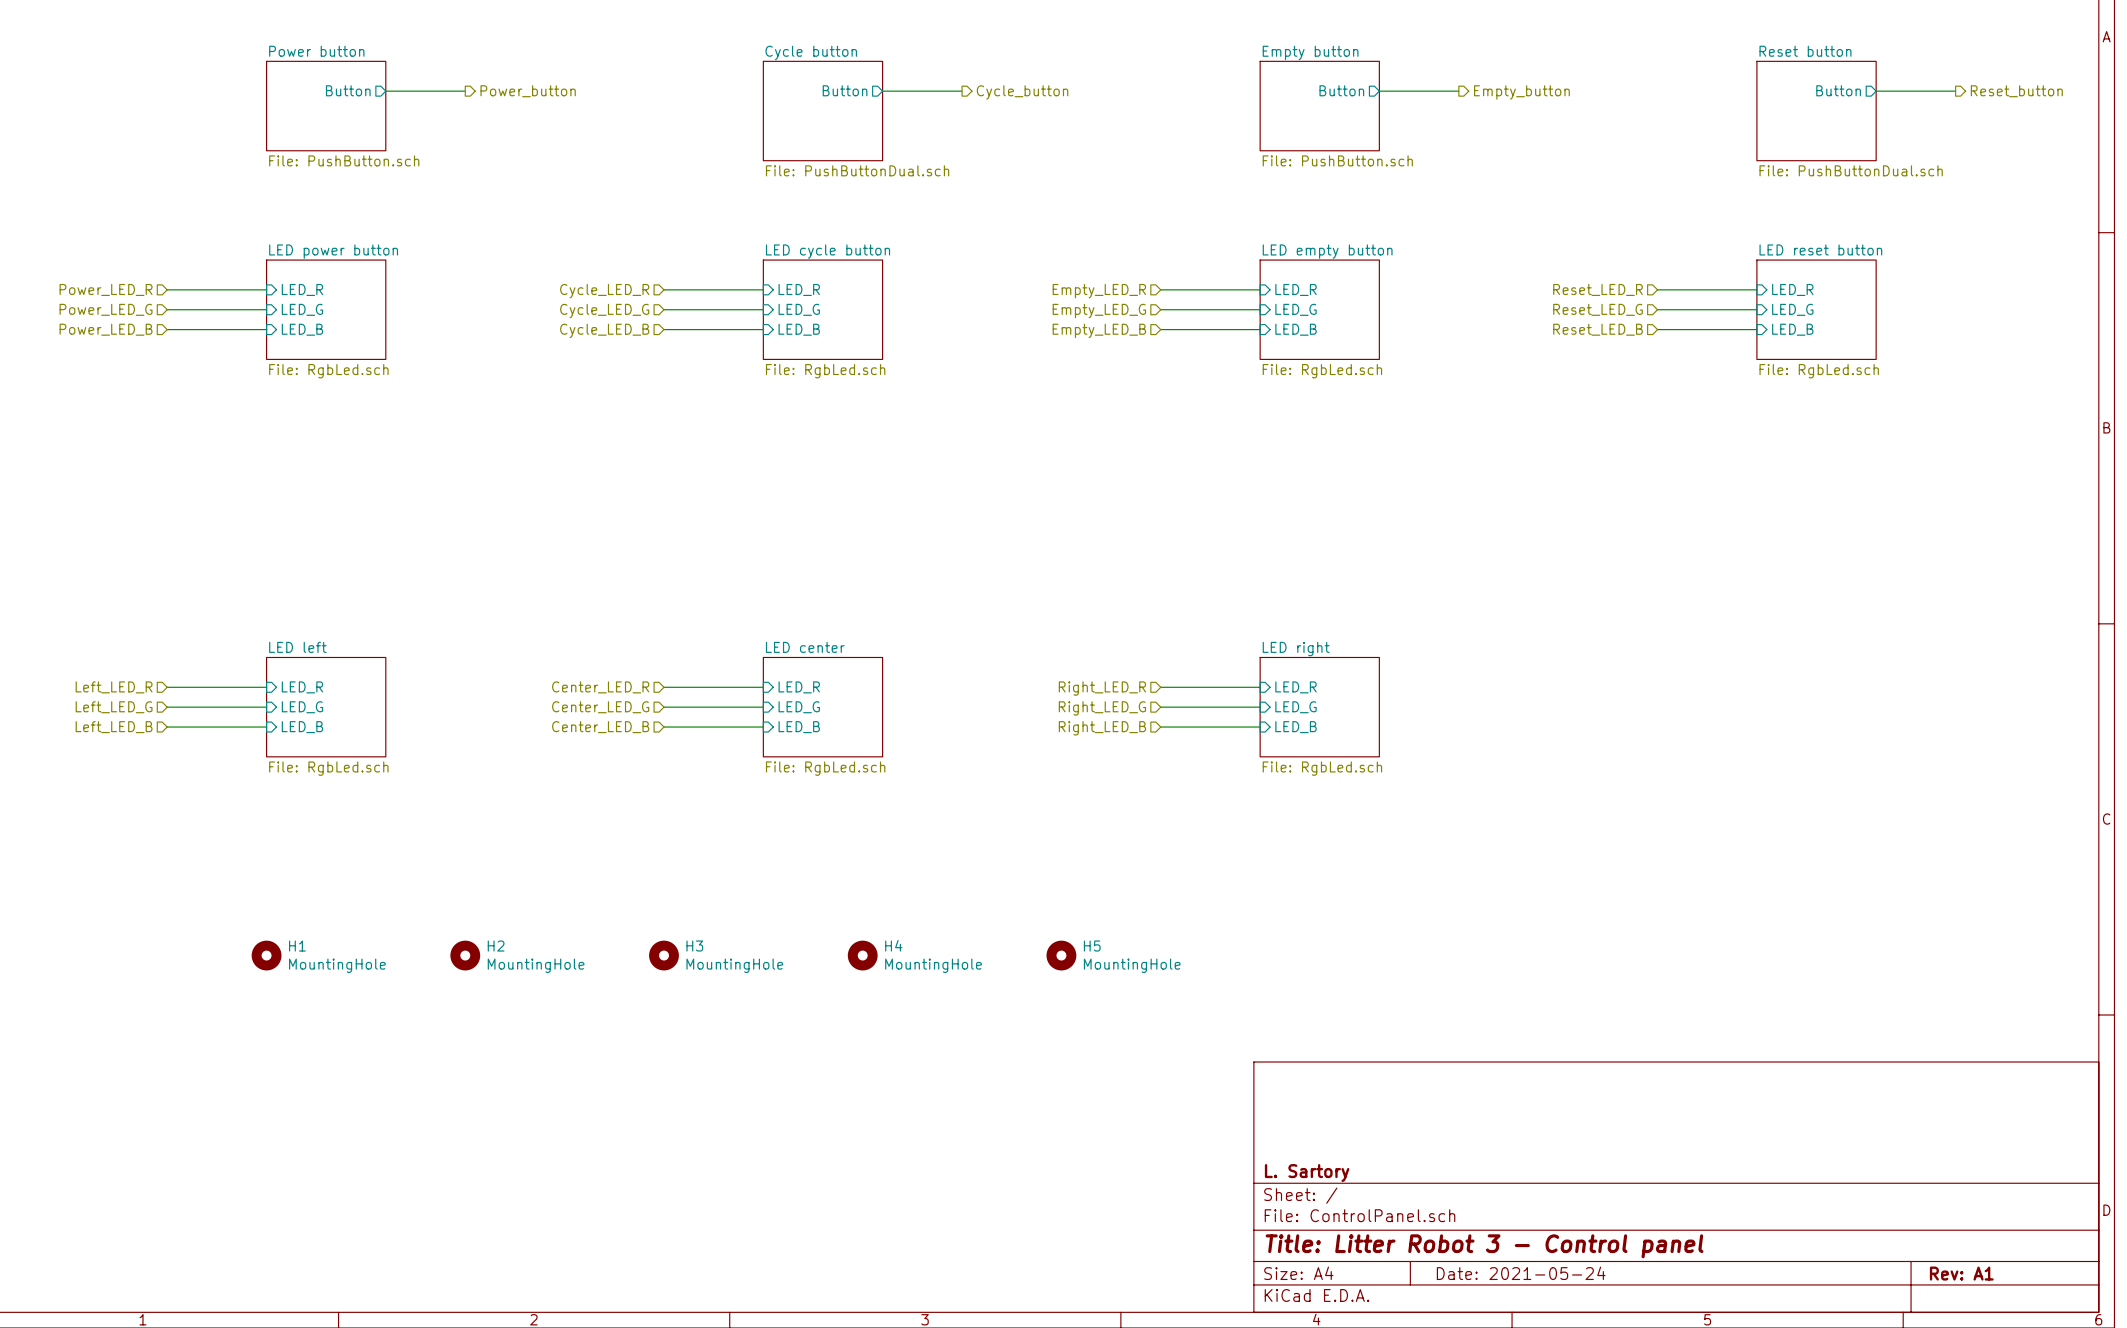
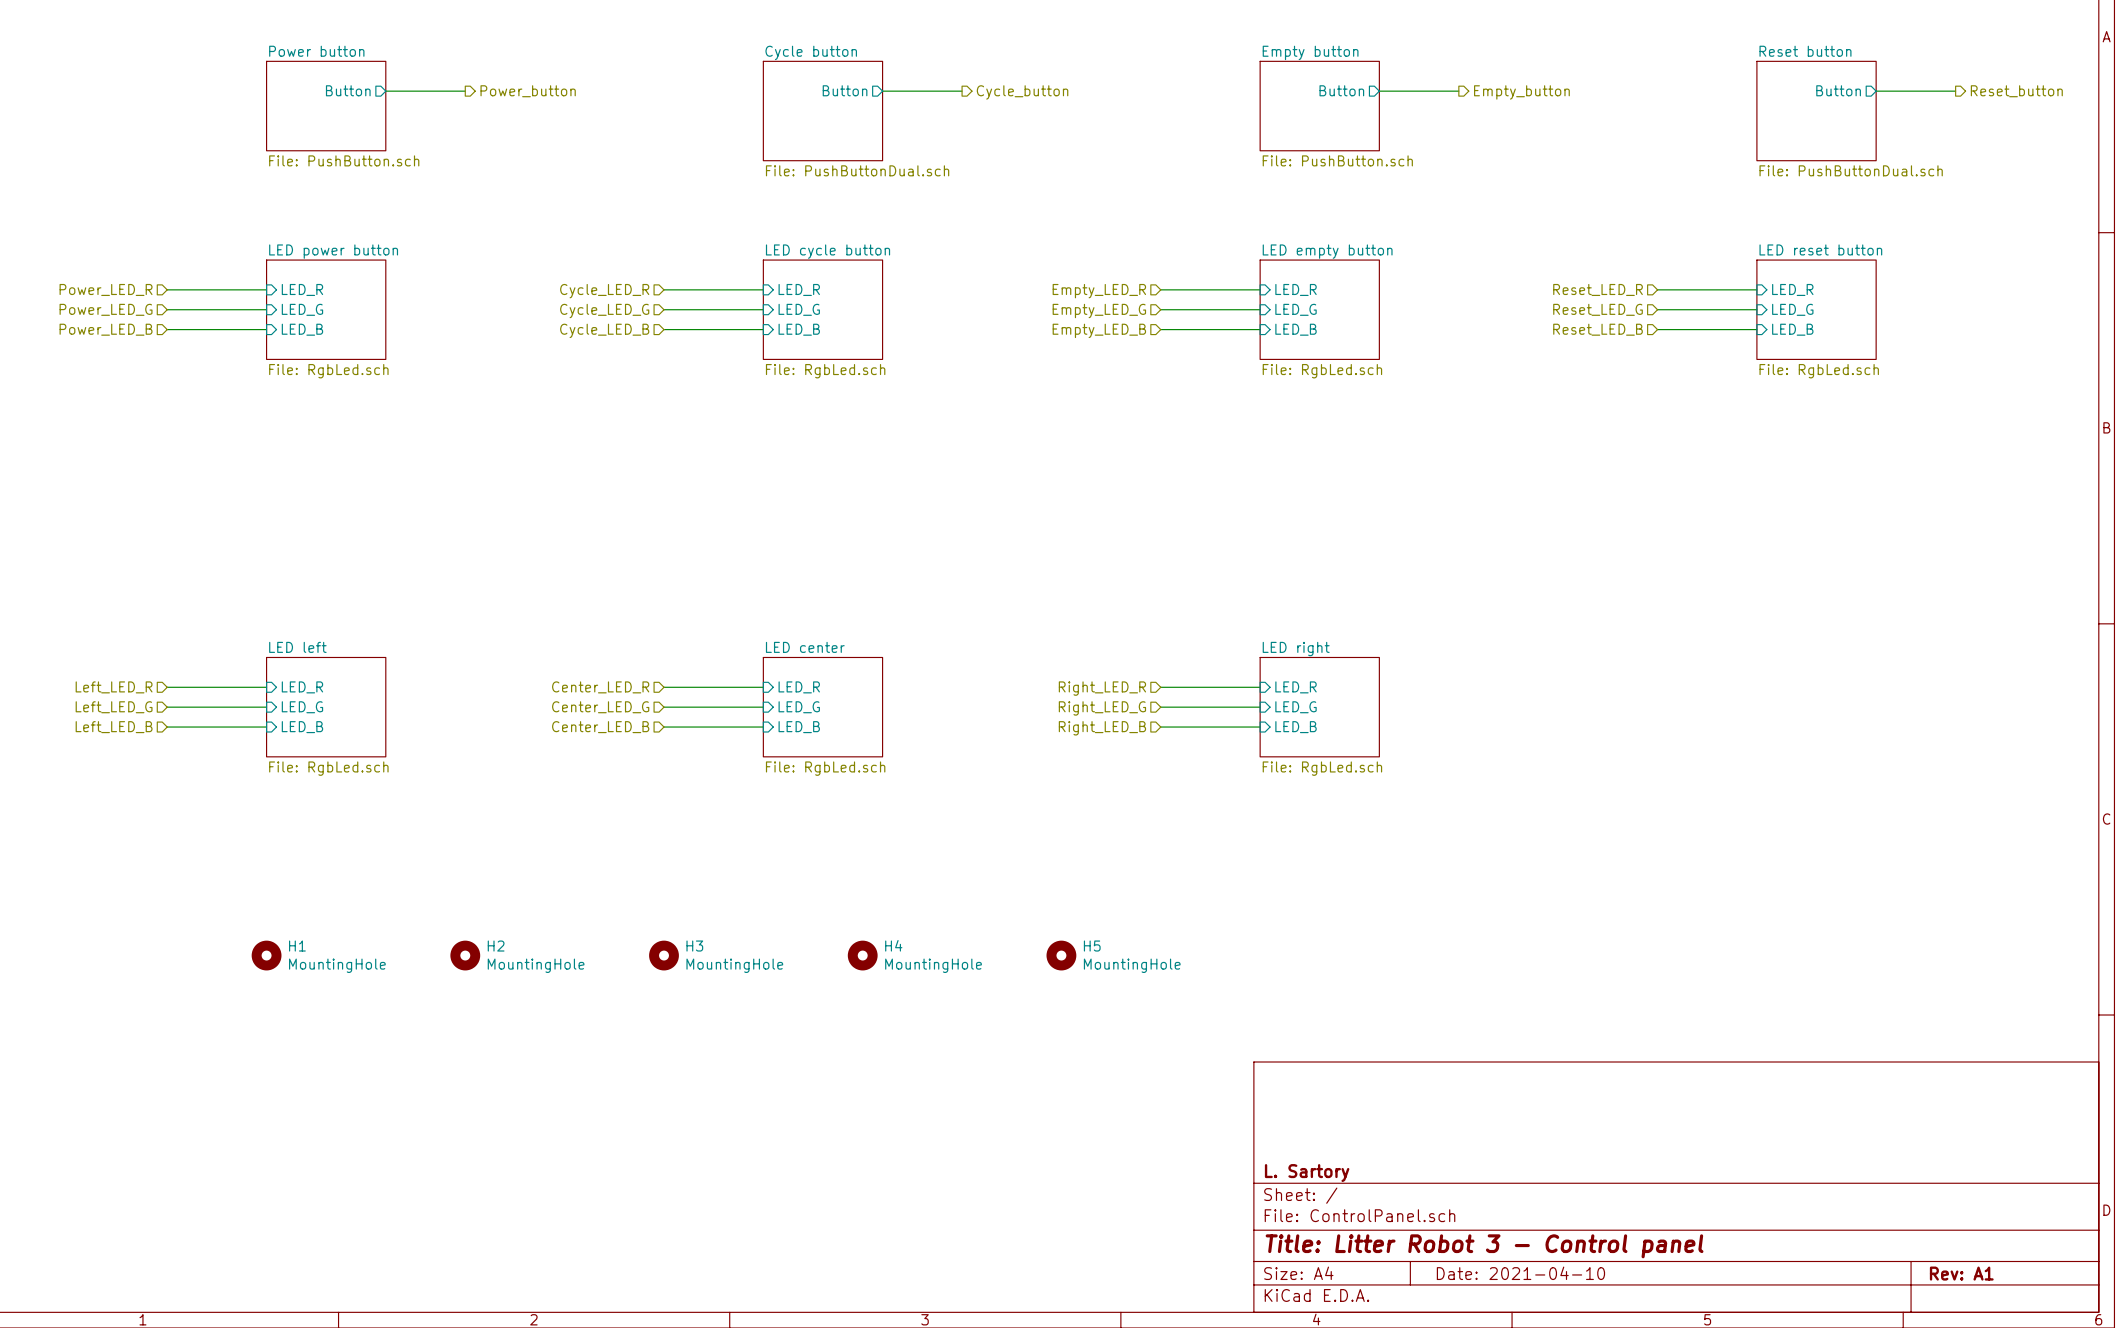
title block: Date: 2021-05-24 (1521, 1273) -> Date: 2021-04-10 (1520, 1273)

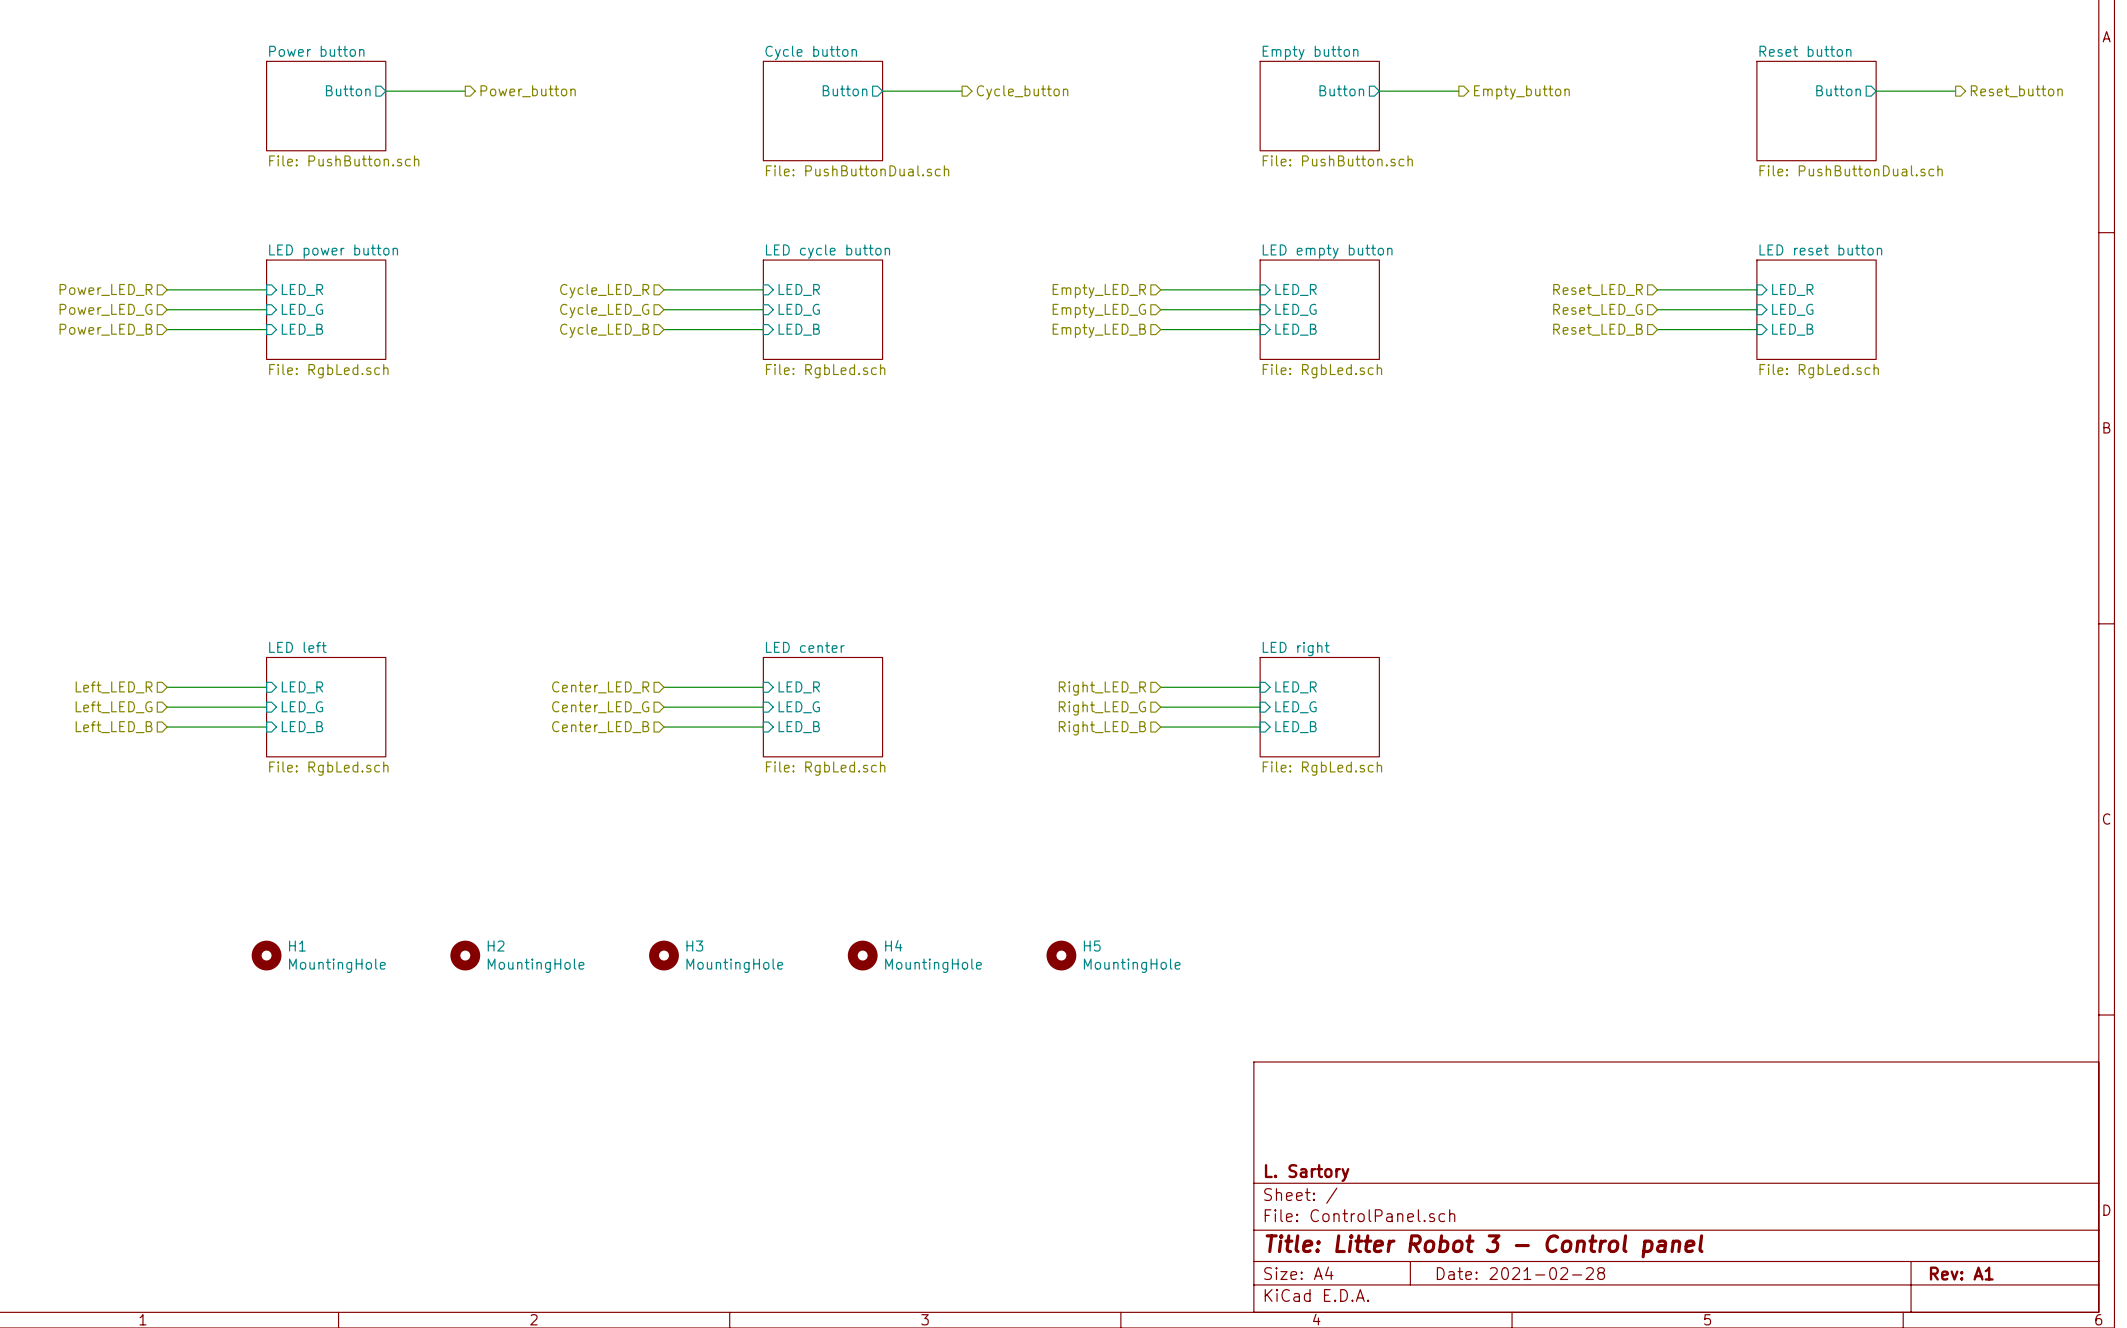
title block: Date: 2021-04-10 (1520, 1273) -> Date: 2021-02-28 (1520, 1273)

